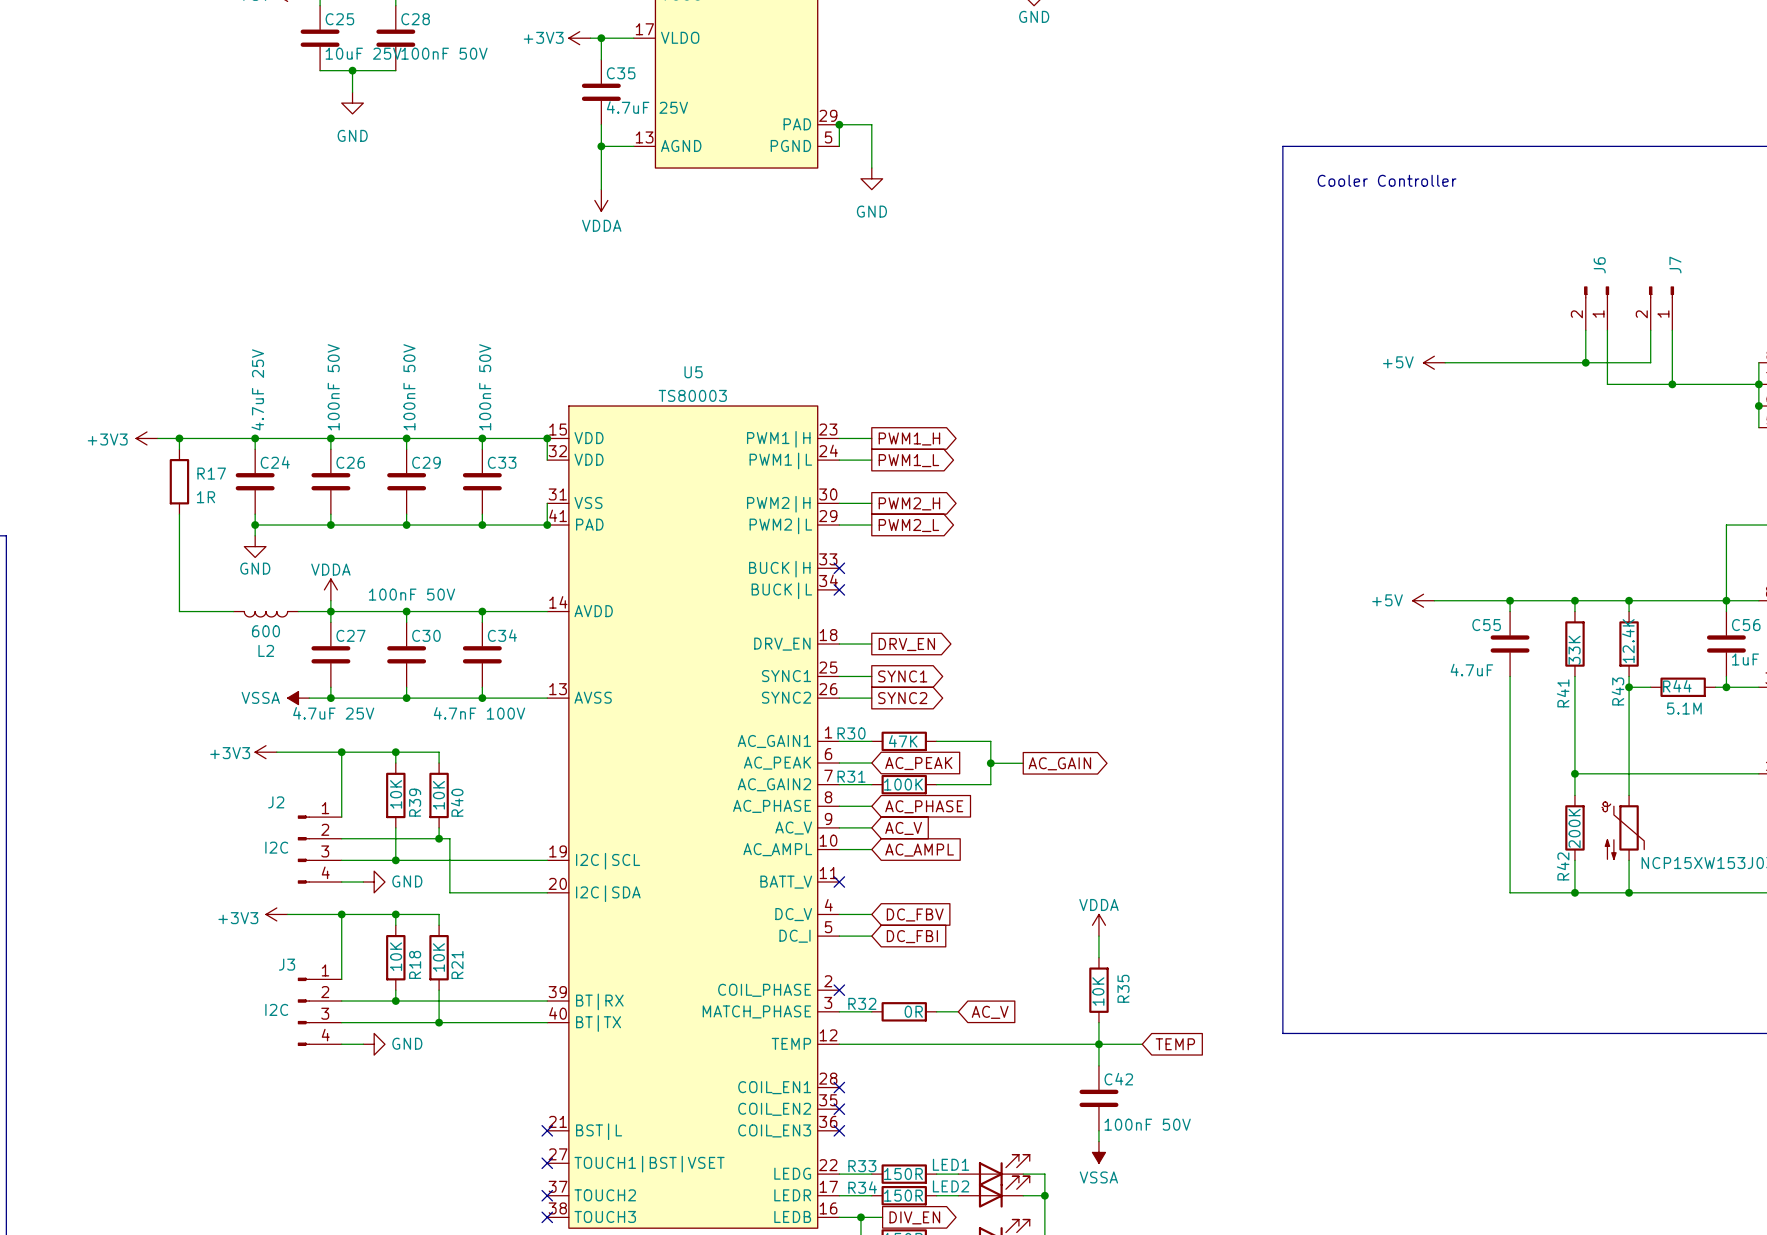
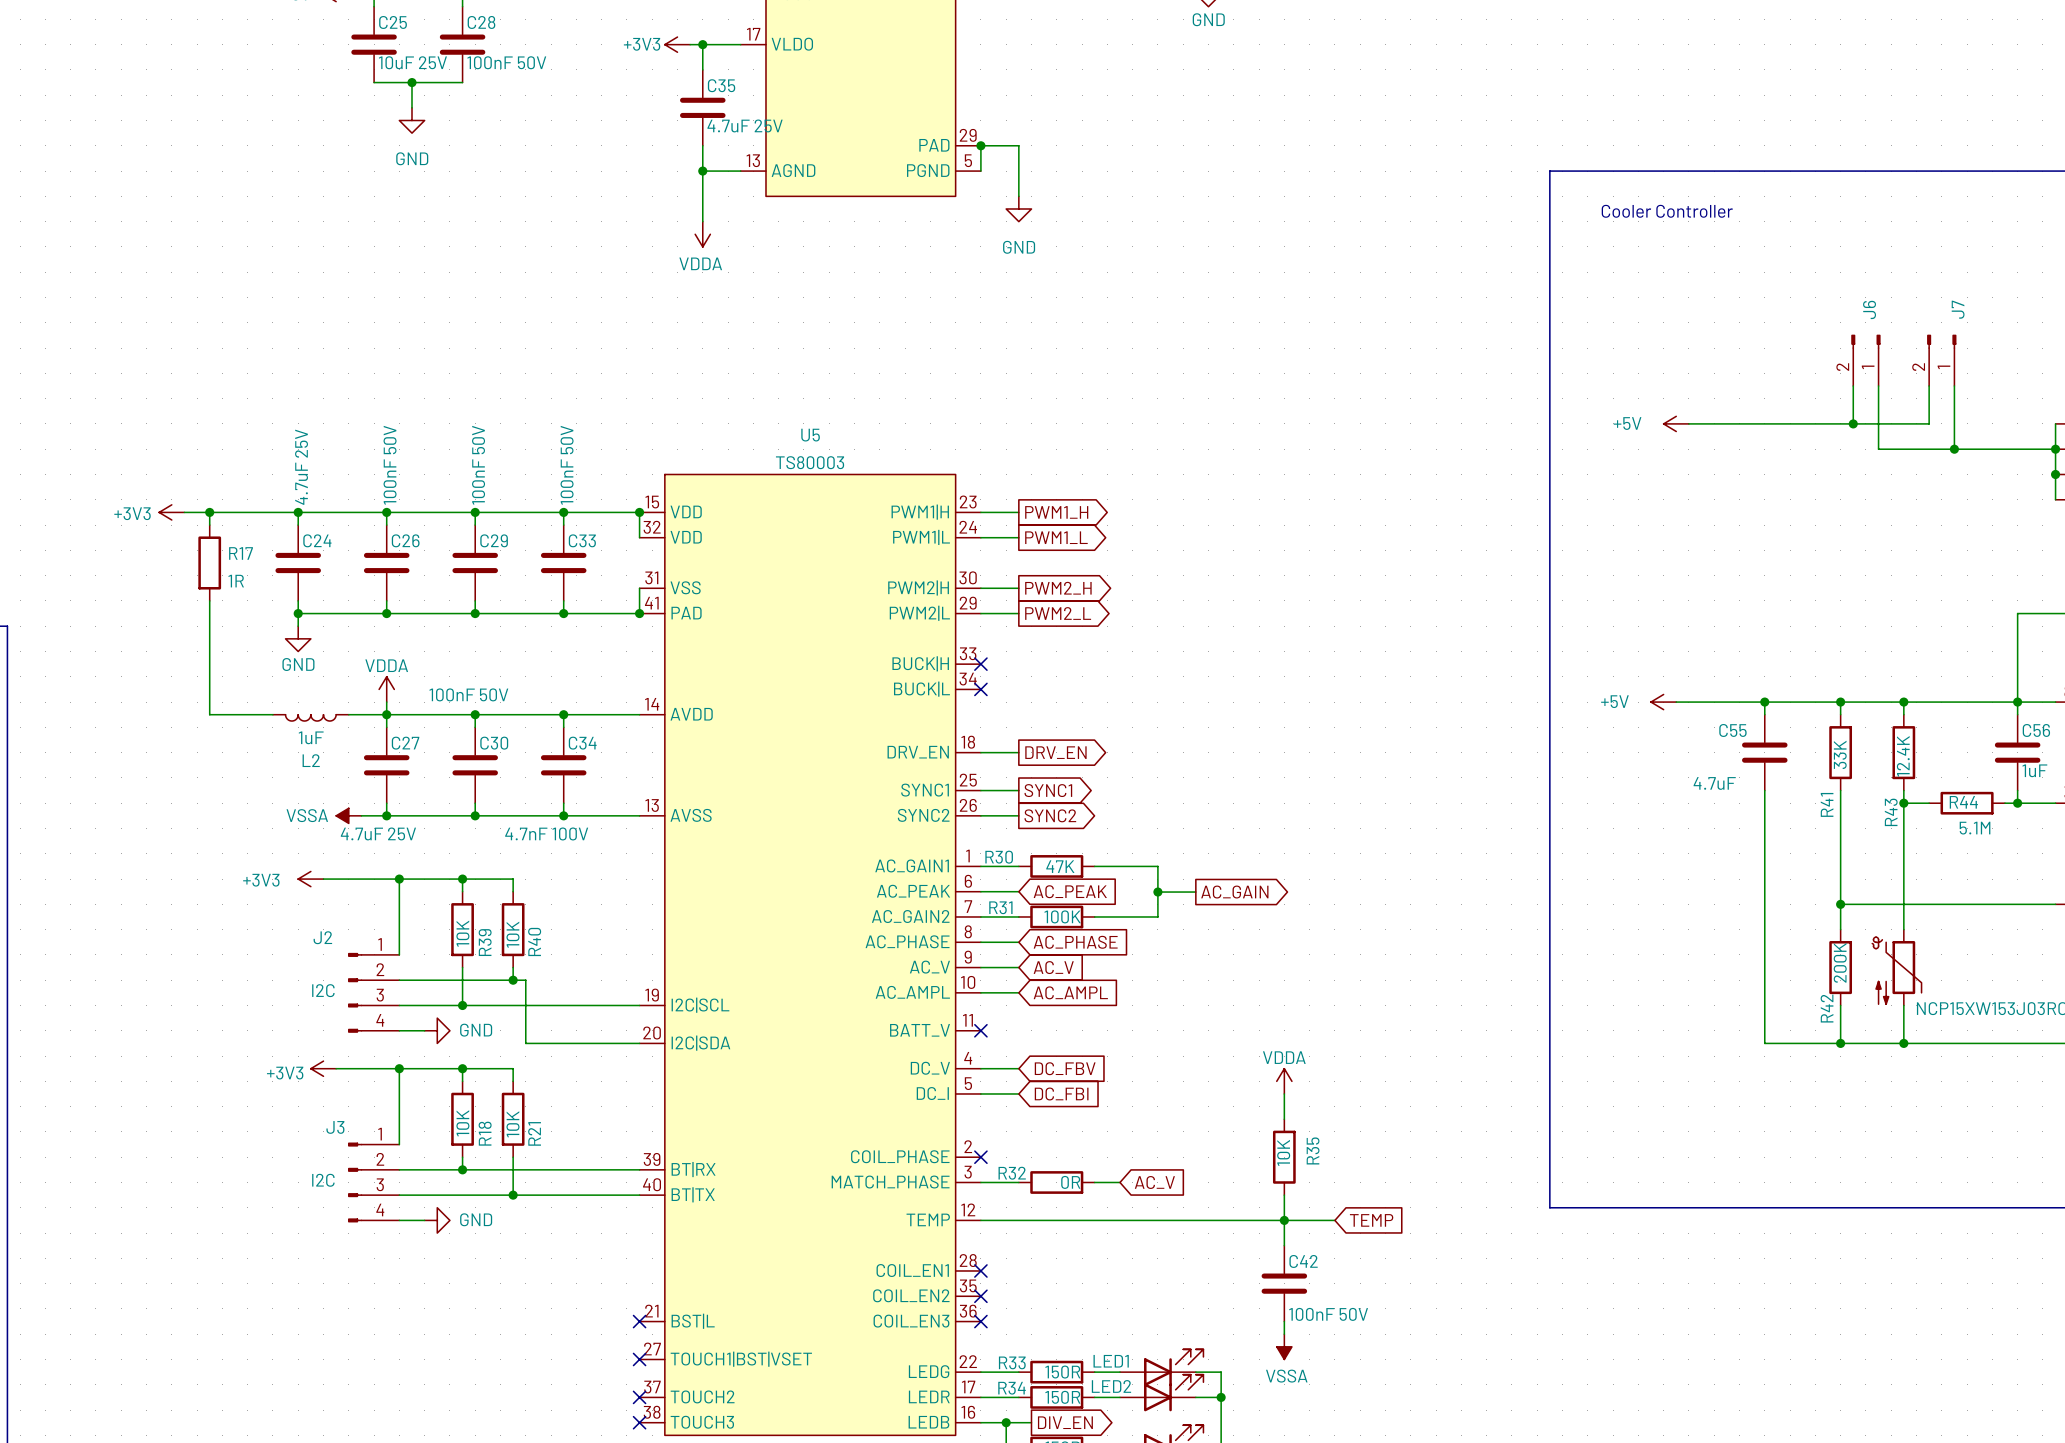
line: (1326, 146) (1282, 146) (1282, 1033) (1326, 1033) -> (1549, 171) (1549, 1207)
text position: Cooler Controller (1387, 180) -> Cooler Controller (1667, 211)
L2 value: 600 (265, 631) -> 1uF (311, 737)

